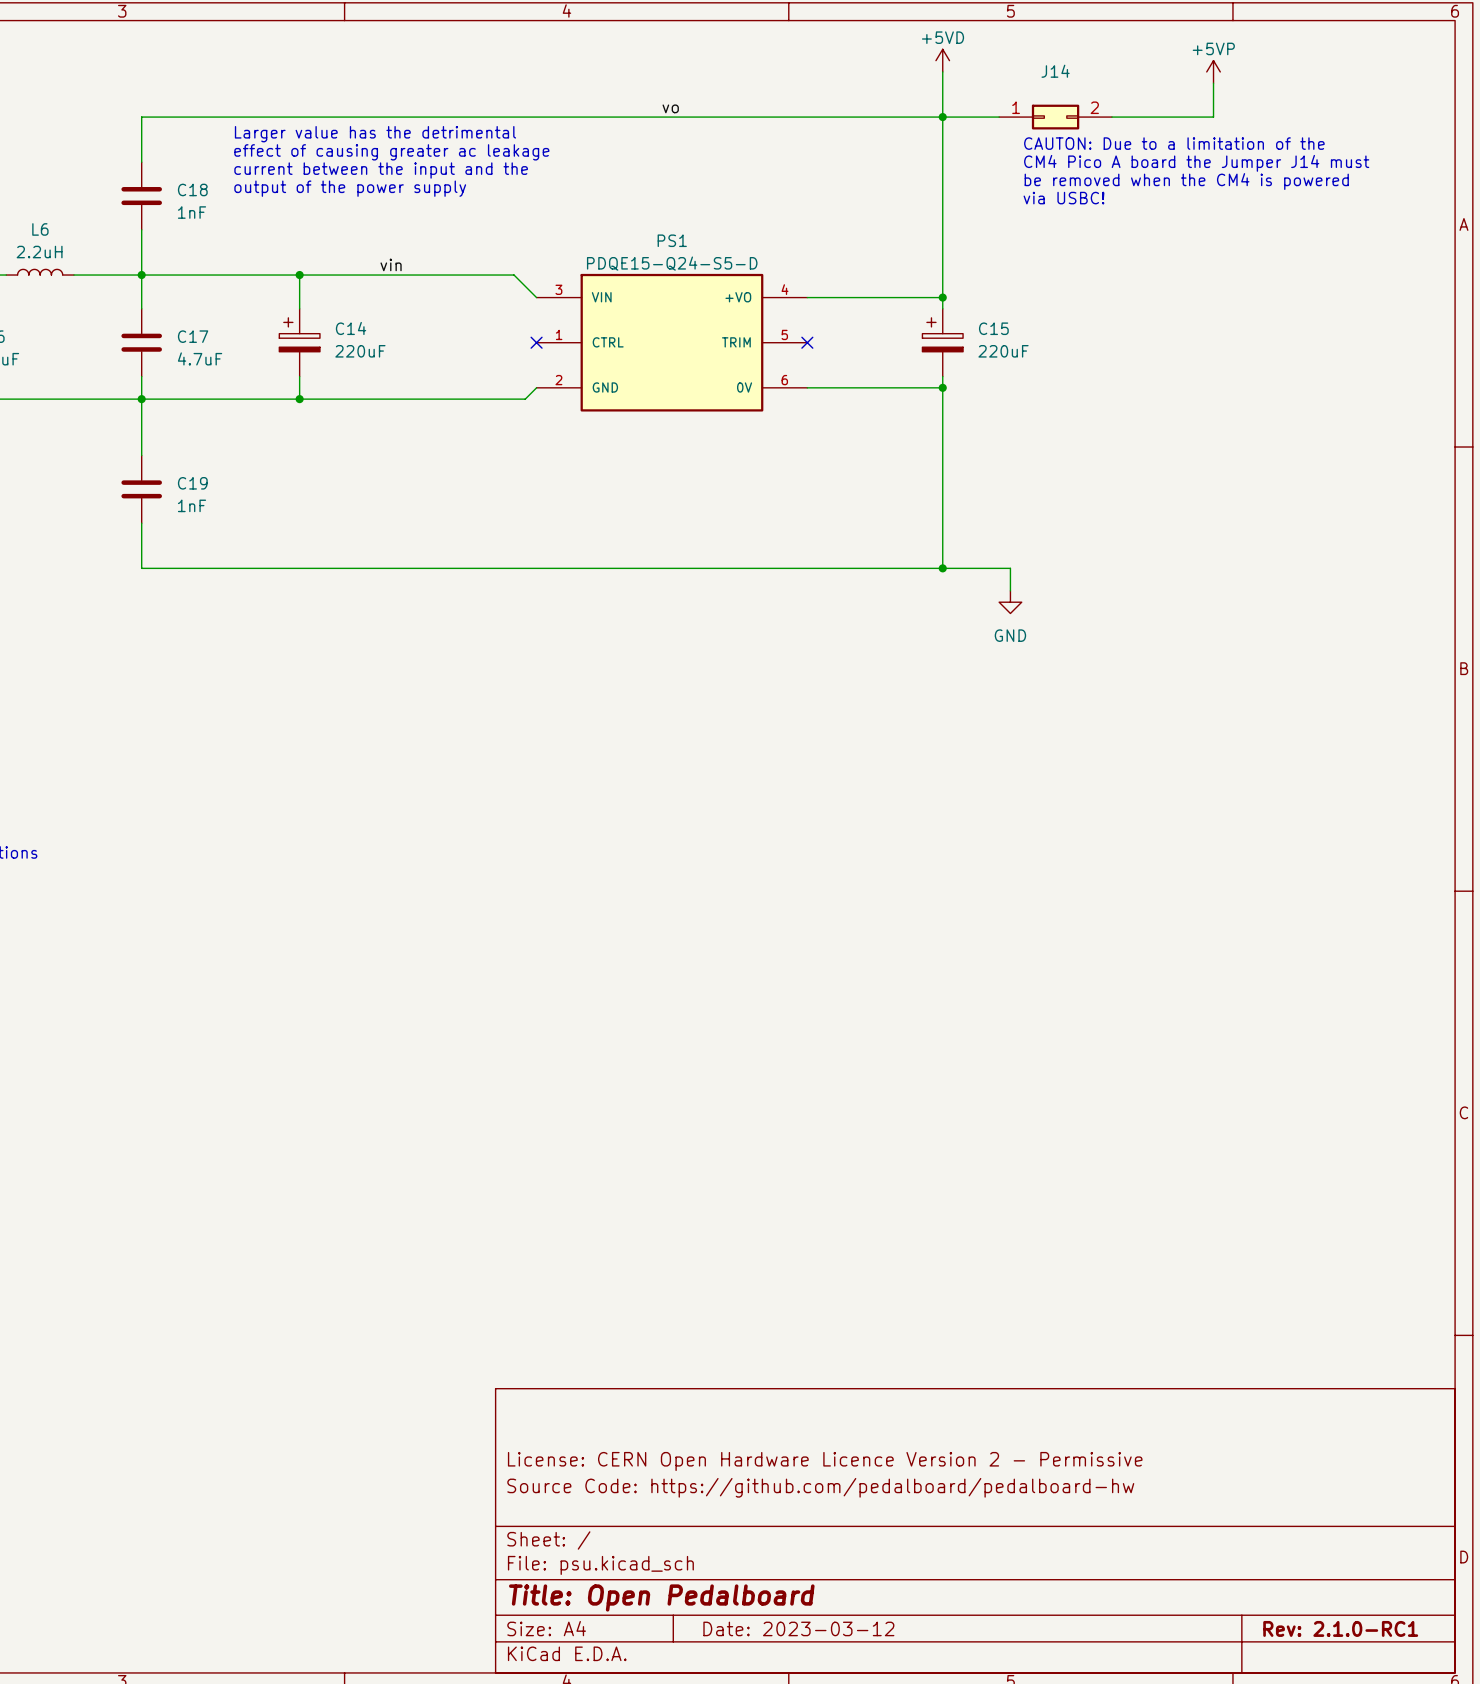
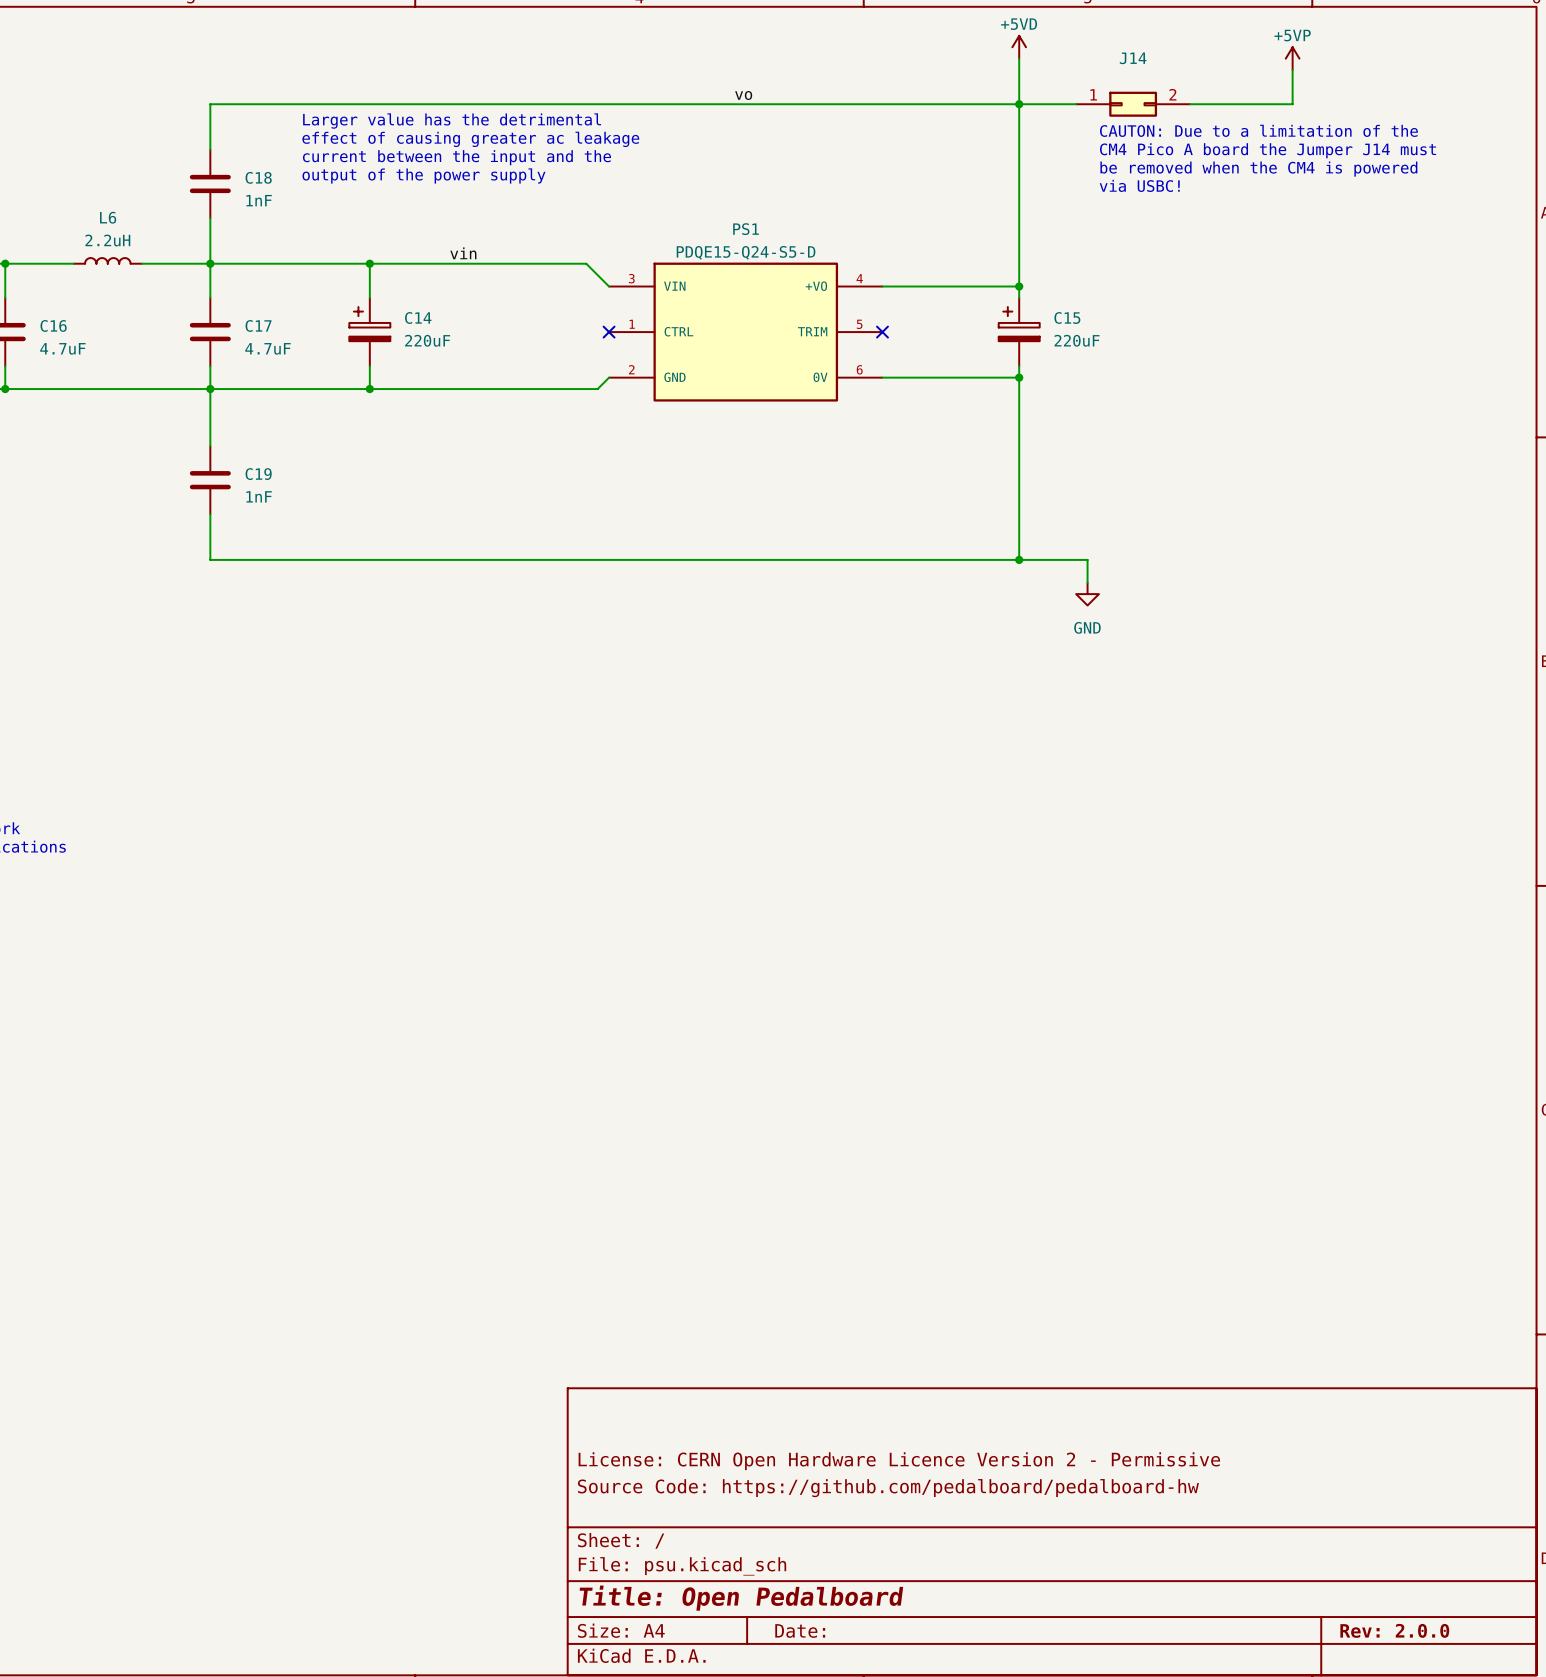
title block: Date: 2023-03-12 (798, 1628) -> Date: (800, 1630)
title block: Rev: 2.1.0-RC1 (1340, 1628) -> Rev: 2.0.0 (1394, 1630)

